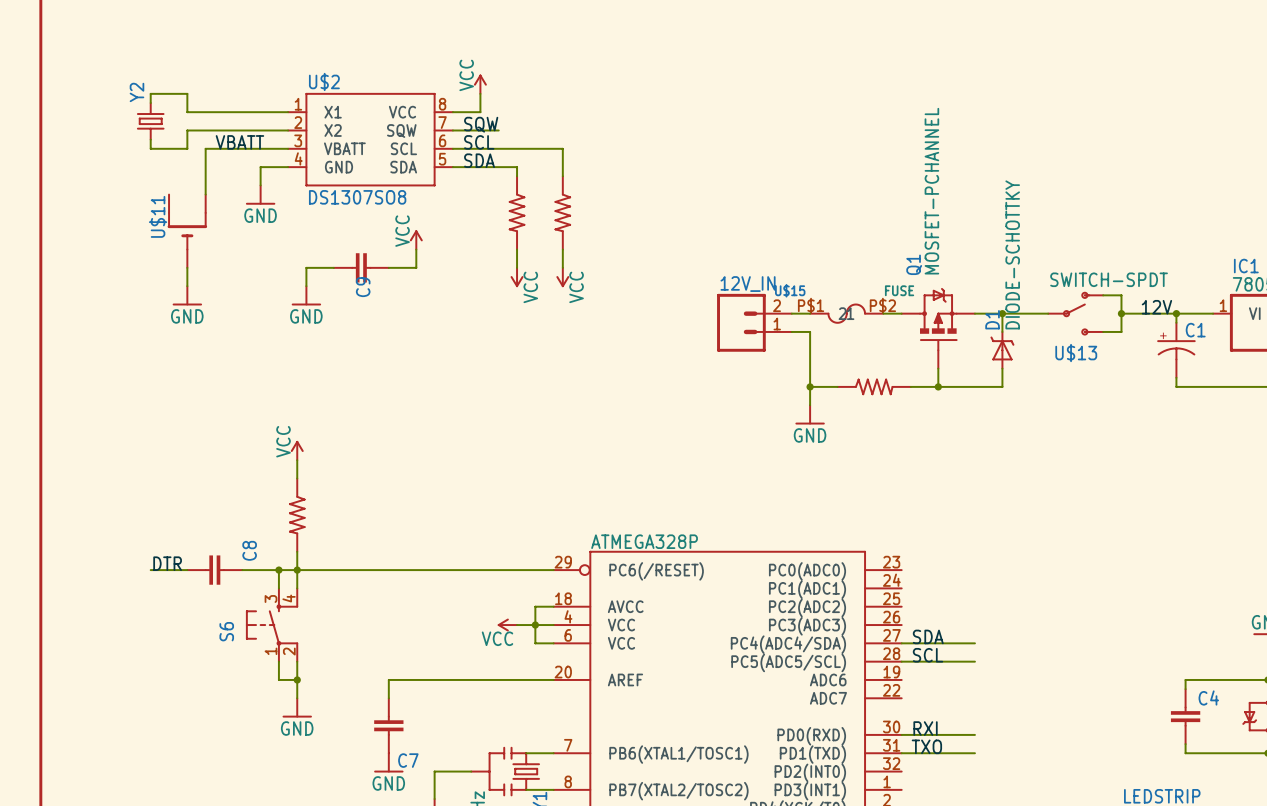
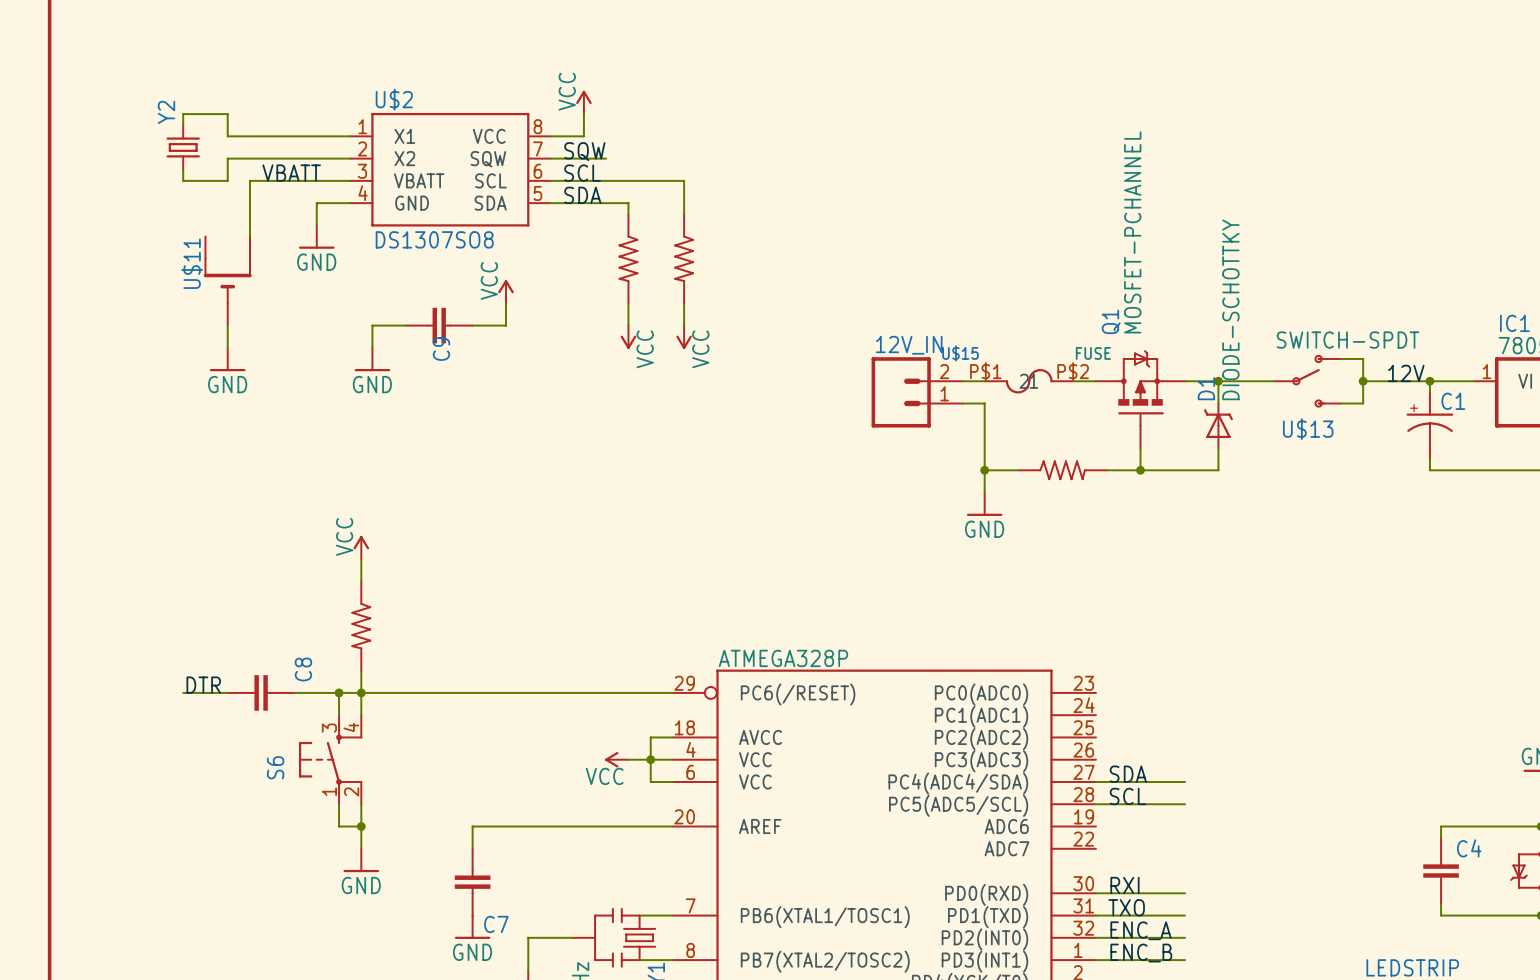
label: none -> ENC_A (1141, 930)
wire: none -> (1095, 937) (1185, 937)
label: none -> ENC_B (1141, 953)
wire: none -> (1095, 960) (1185, 960)

